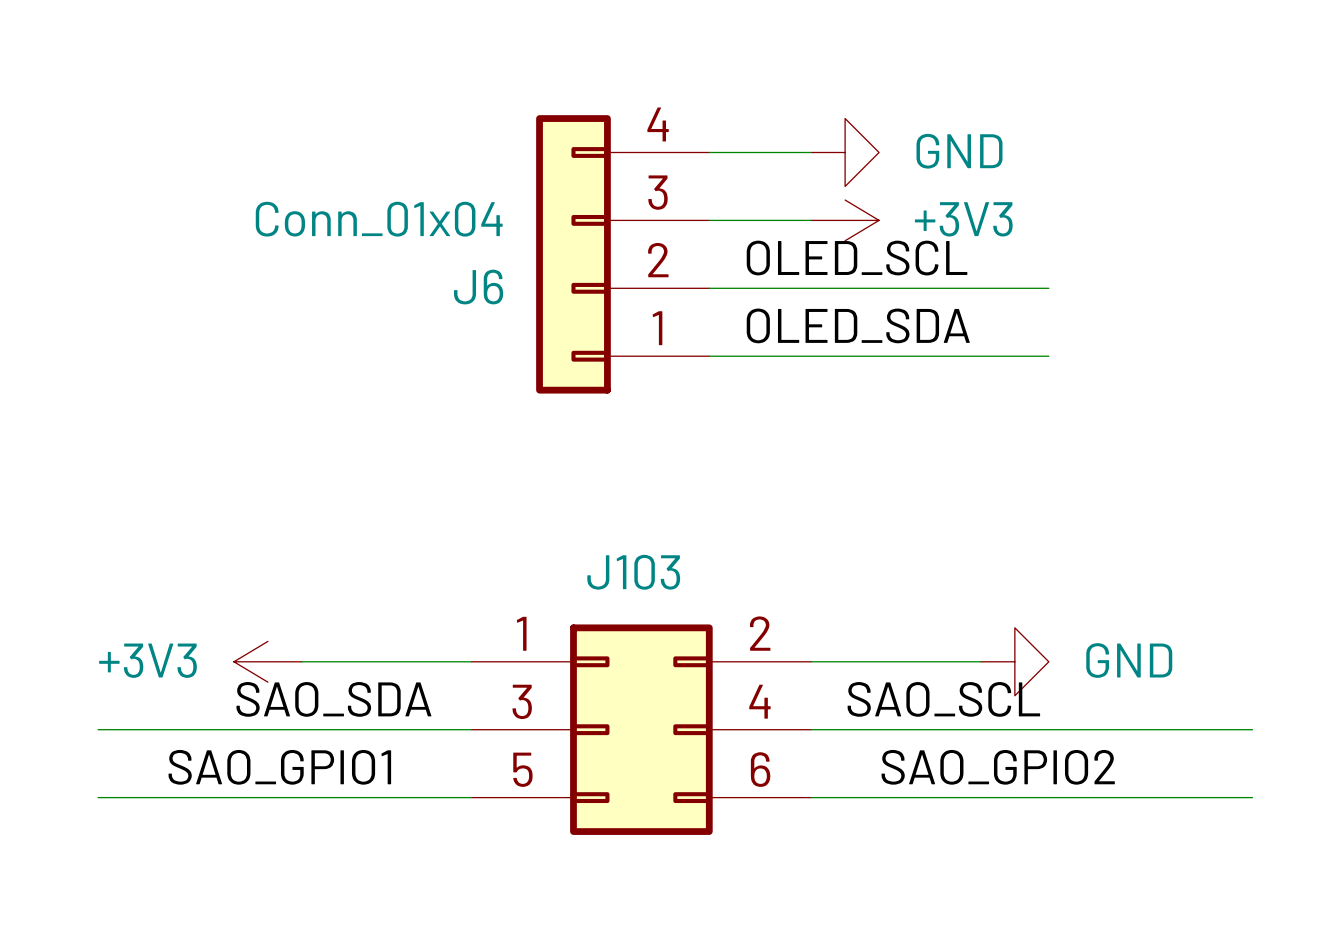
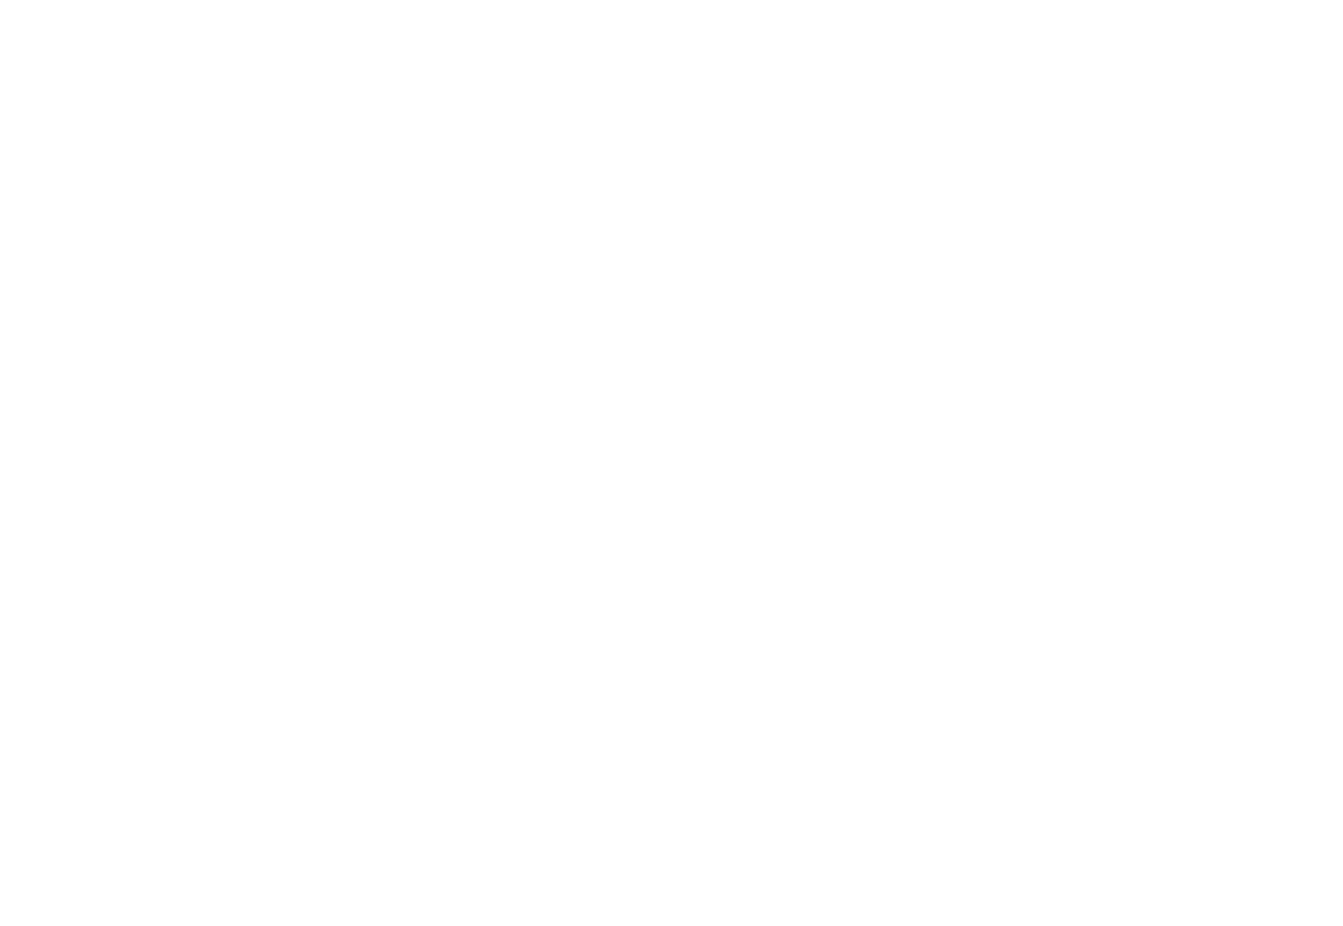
wire: (709, 152) (811, 152) -> none
power symbol: GND (845, 152) -> none
wire: (709, 220) (811, 220) -> none
power symbol: +3V3 (845, 220) -> none
J6: Conn_01x04 (622, 254) -> none
label: OLED_SCL (857, 258) -> none
wire: (709, 288) (1048, 288) -> none
label: OLED_SDA (858, 325) -> none
wire: (709, 356) (1048, 356) -> none
power symbol: +3V3 (267, 661) -> none
wire: (301, 661) (471, 661) -> none
wire: (811, 661) (980, 661) -> none
power symbol: GND (1014, 661) -> none
label: SAO_SDA (333, 699) -> none
label: SAO_SCL (943, 699) -> none
wire: (98, 729) (471, 729) -> none
J103: (641, 729) -> none
wire: (811, 729) (1252, 729) -> none
label: SAO_GPIO1 (279, 767) -> none
label: SAO_GPIO2 (998, 767) -> none
wire: (98, 797) (471, 797) -> none
wire: (811, 797) (1252, 797) -> none

